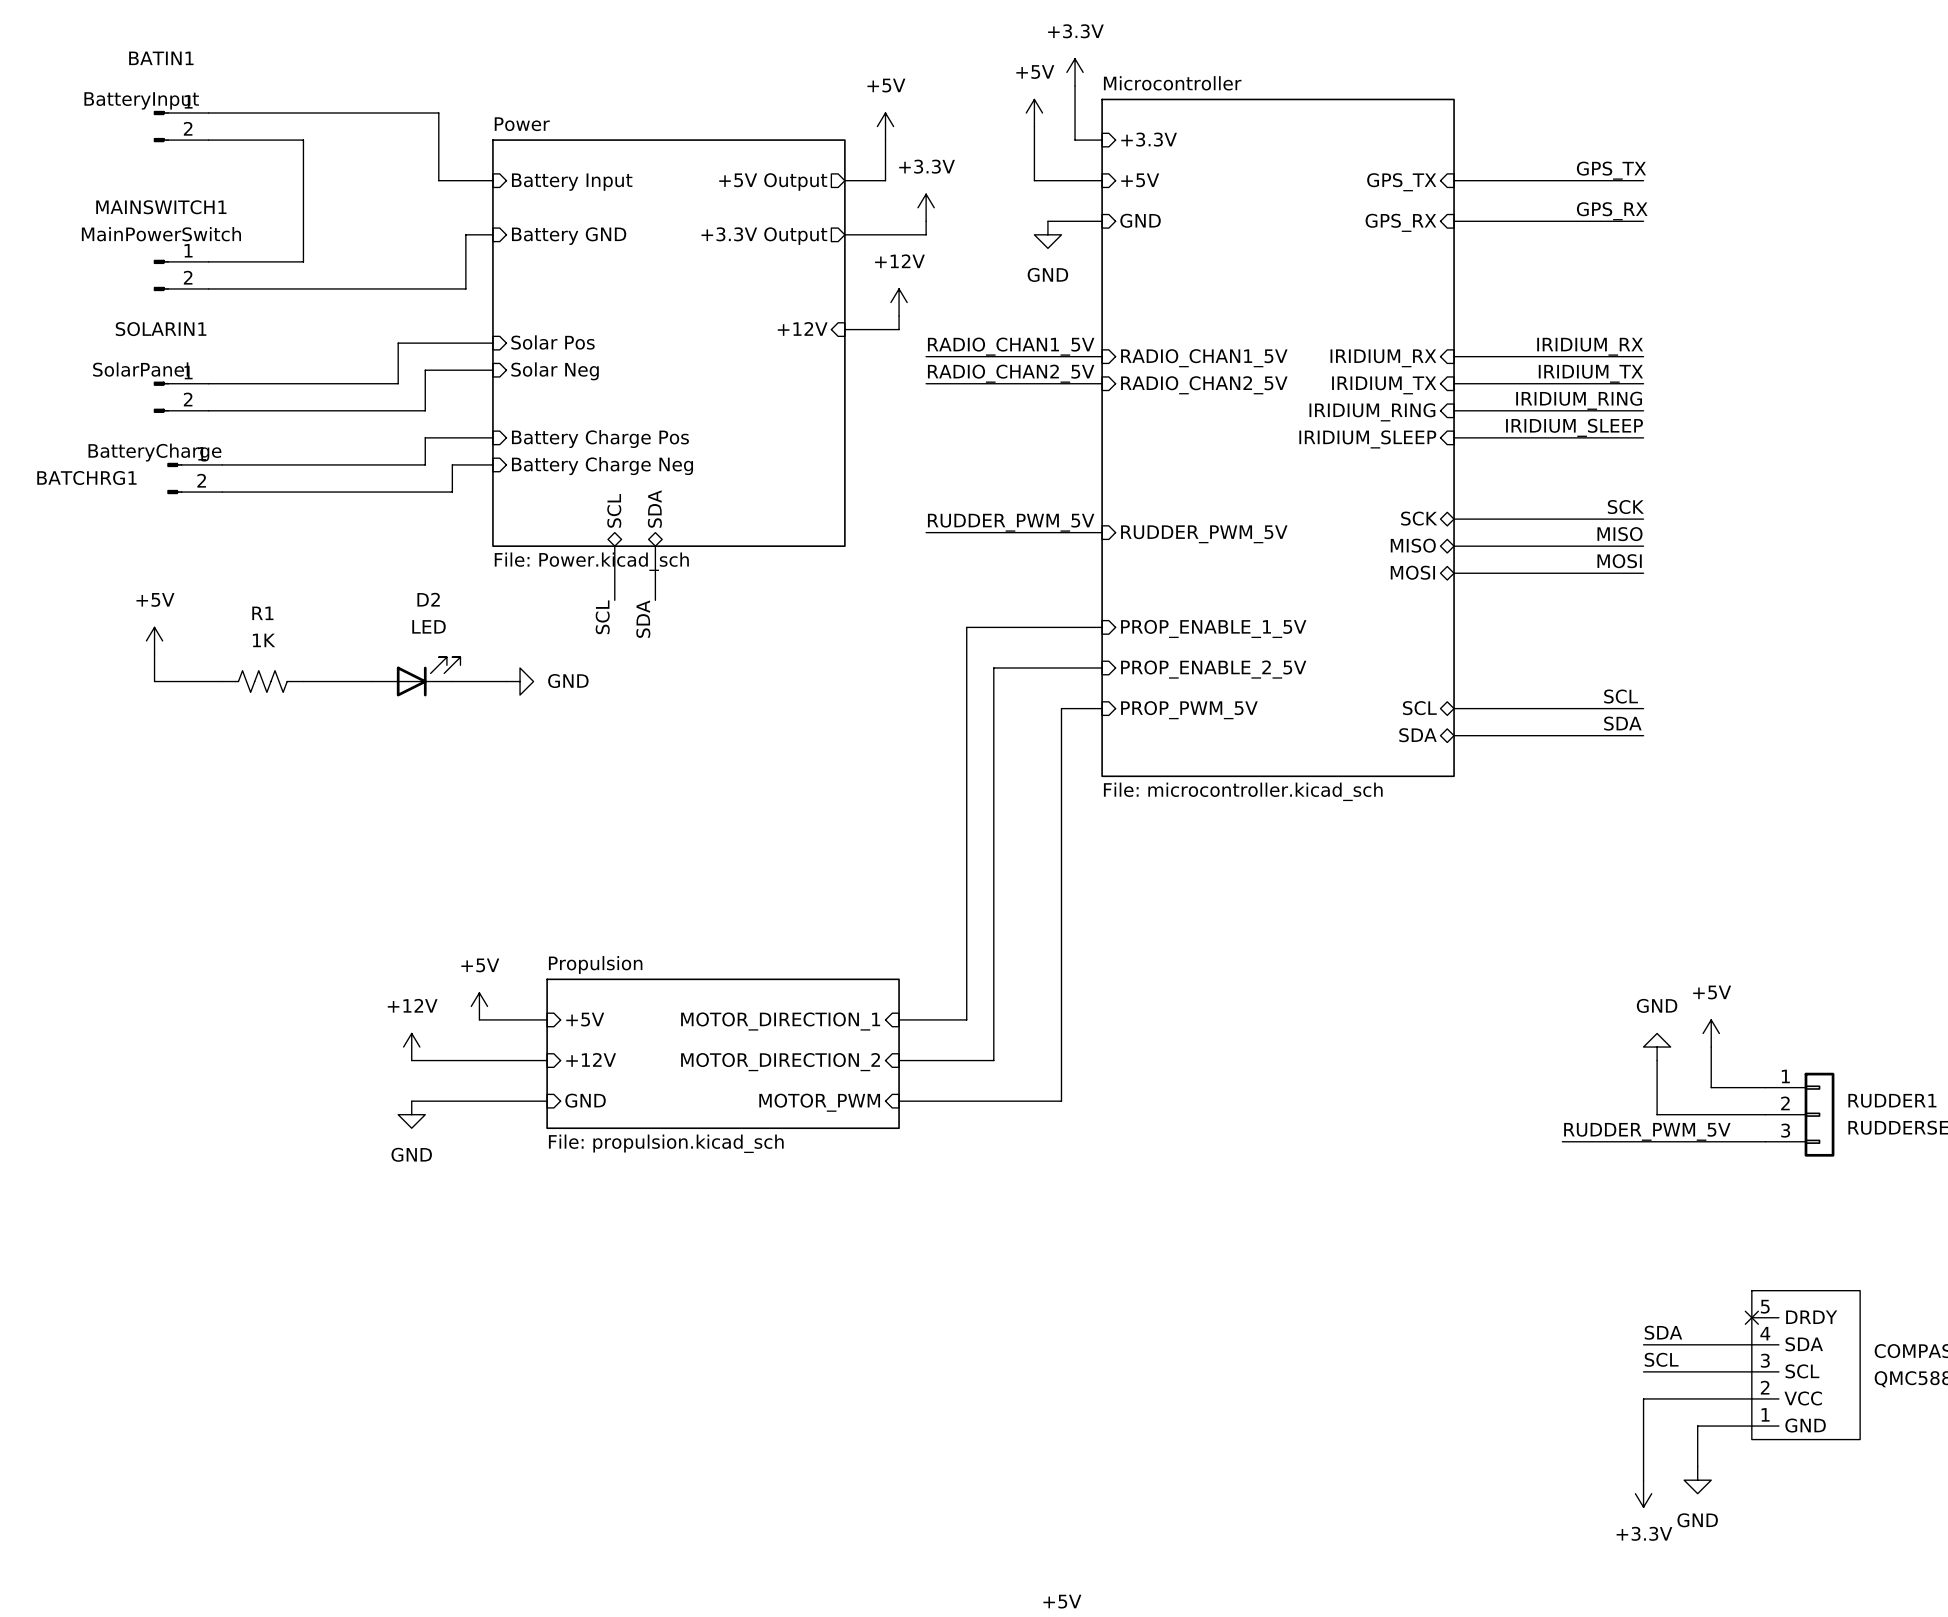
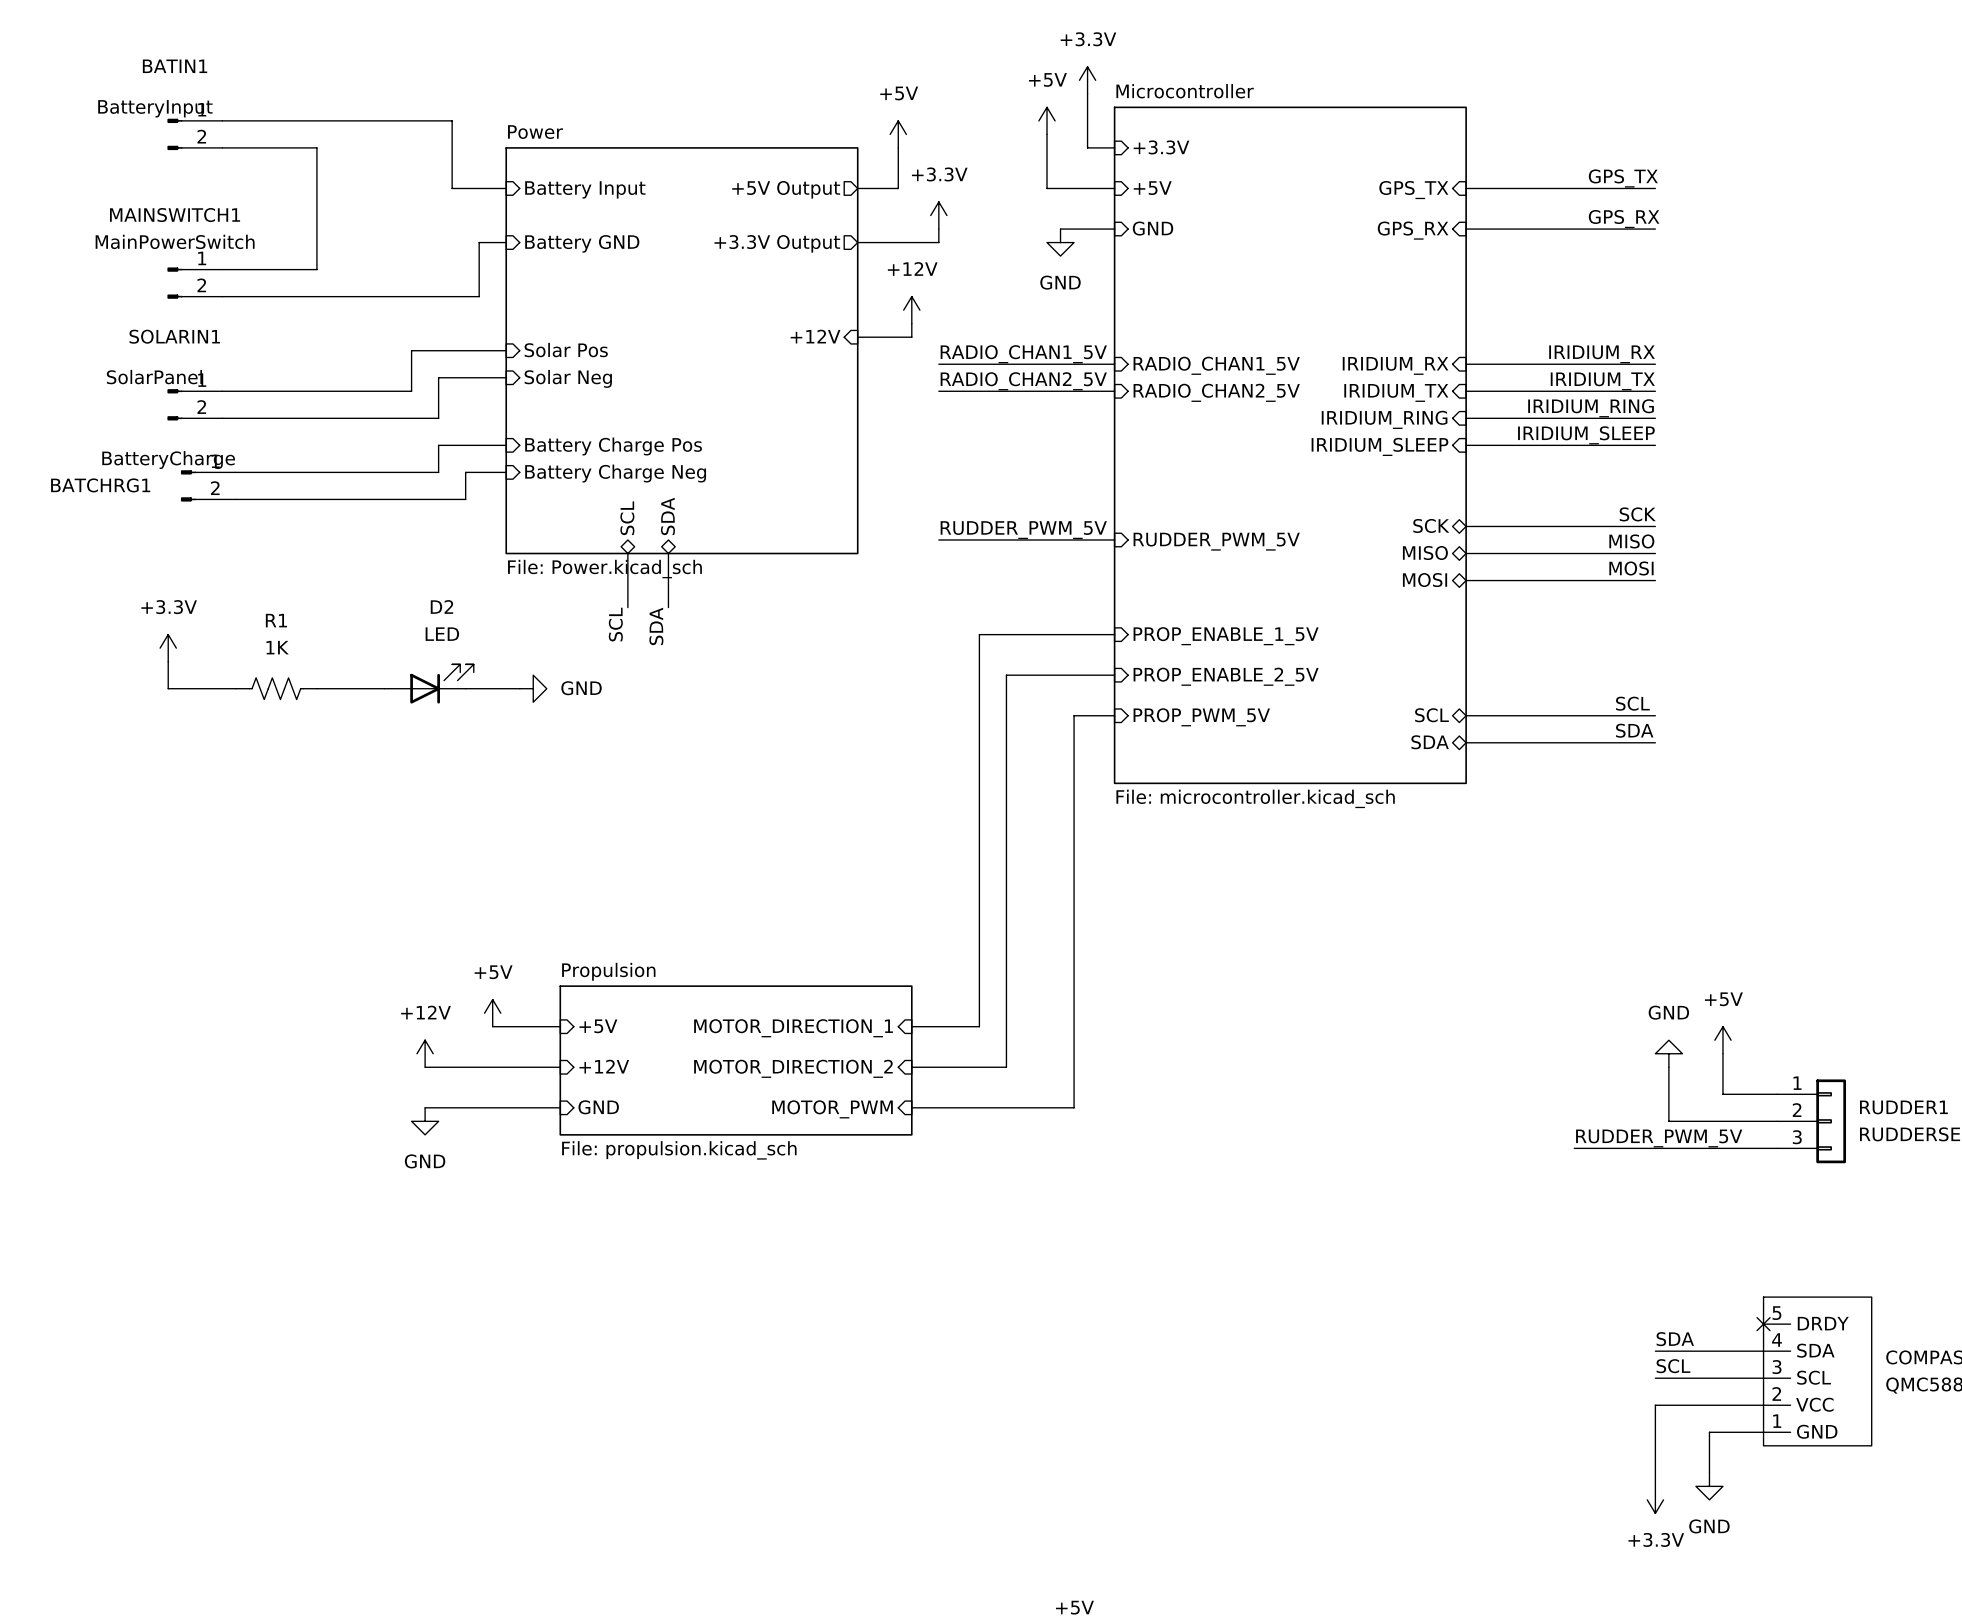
power symbol: +5V (154, 640) -> +3.3V (168, 648)

